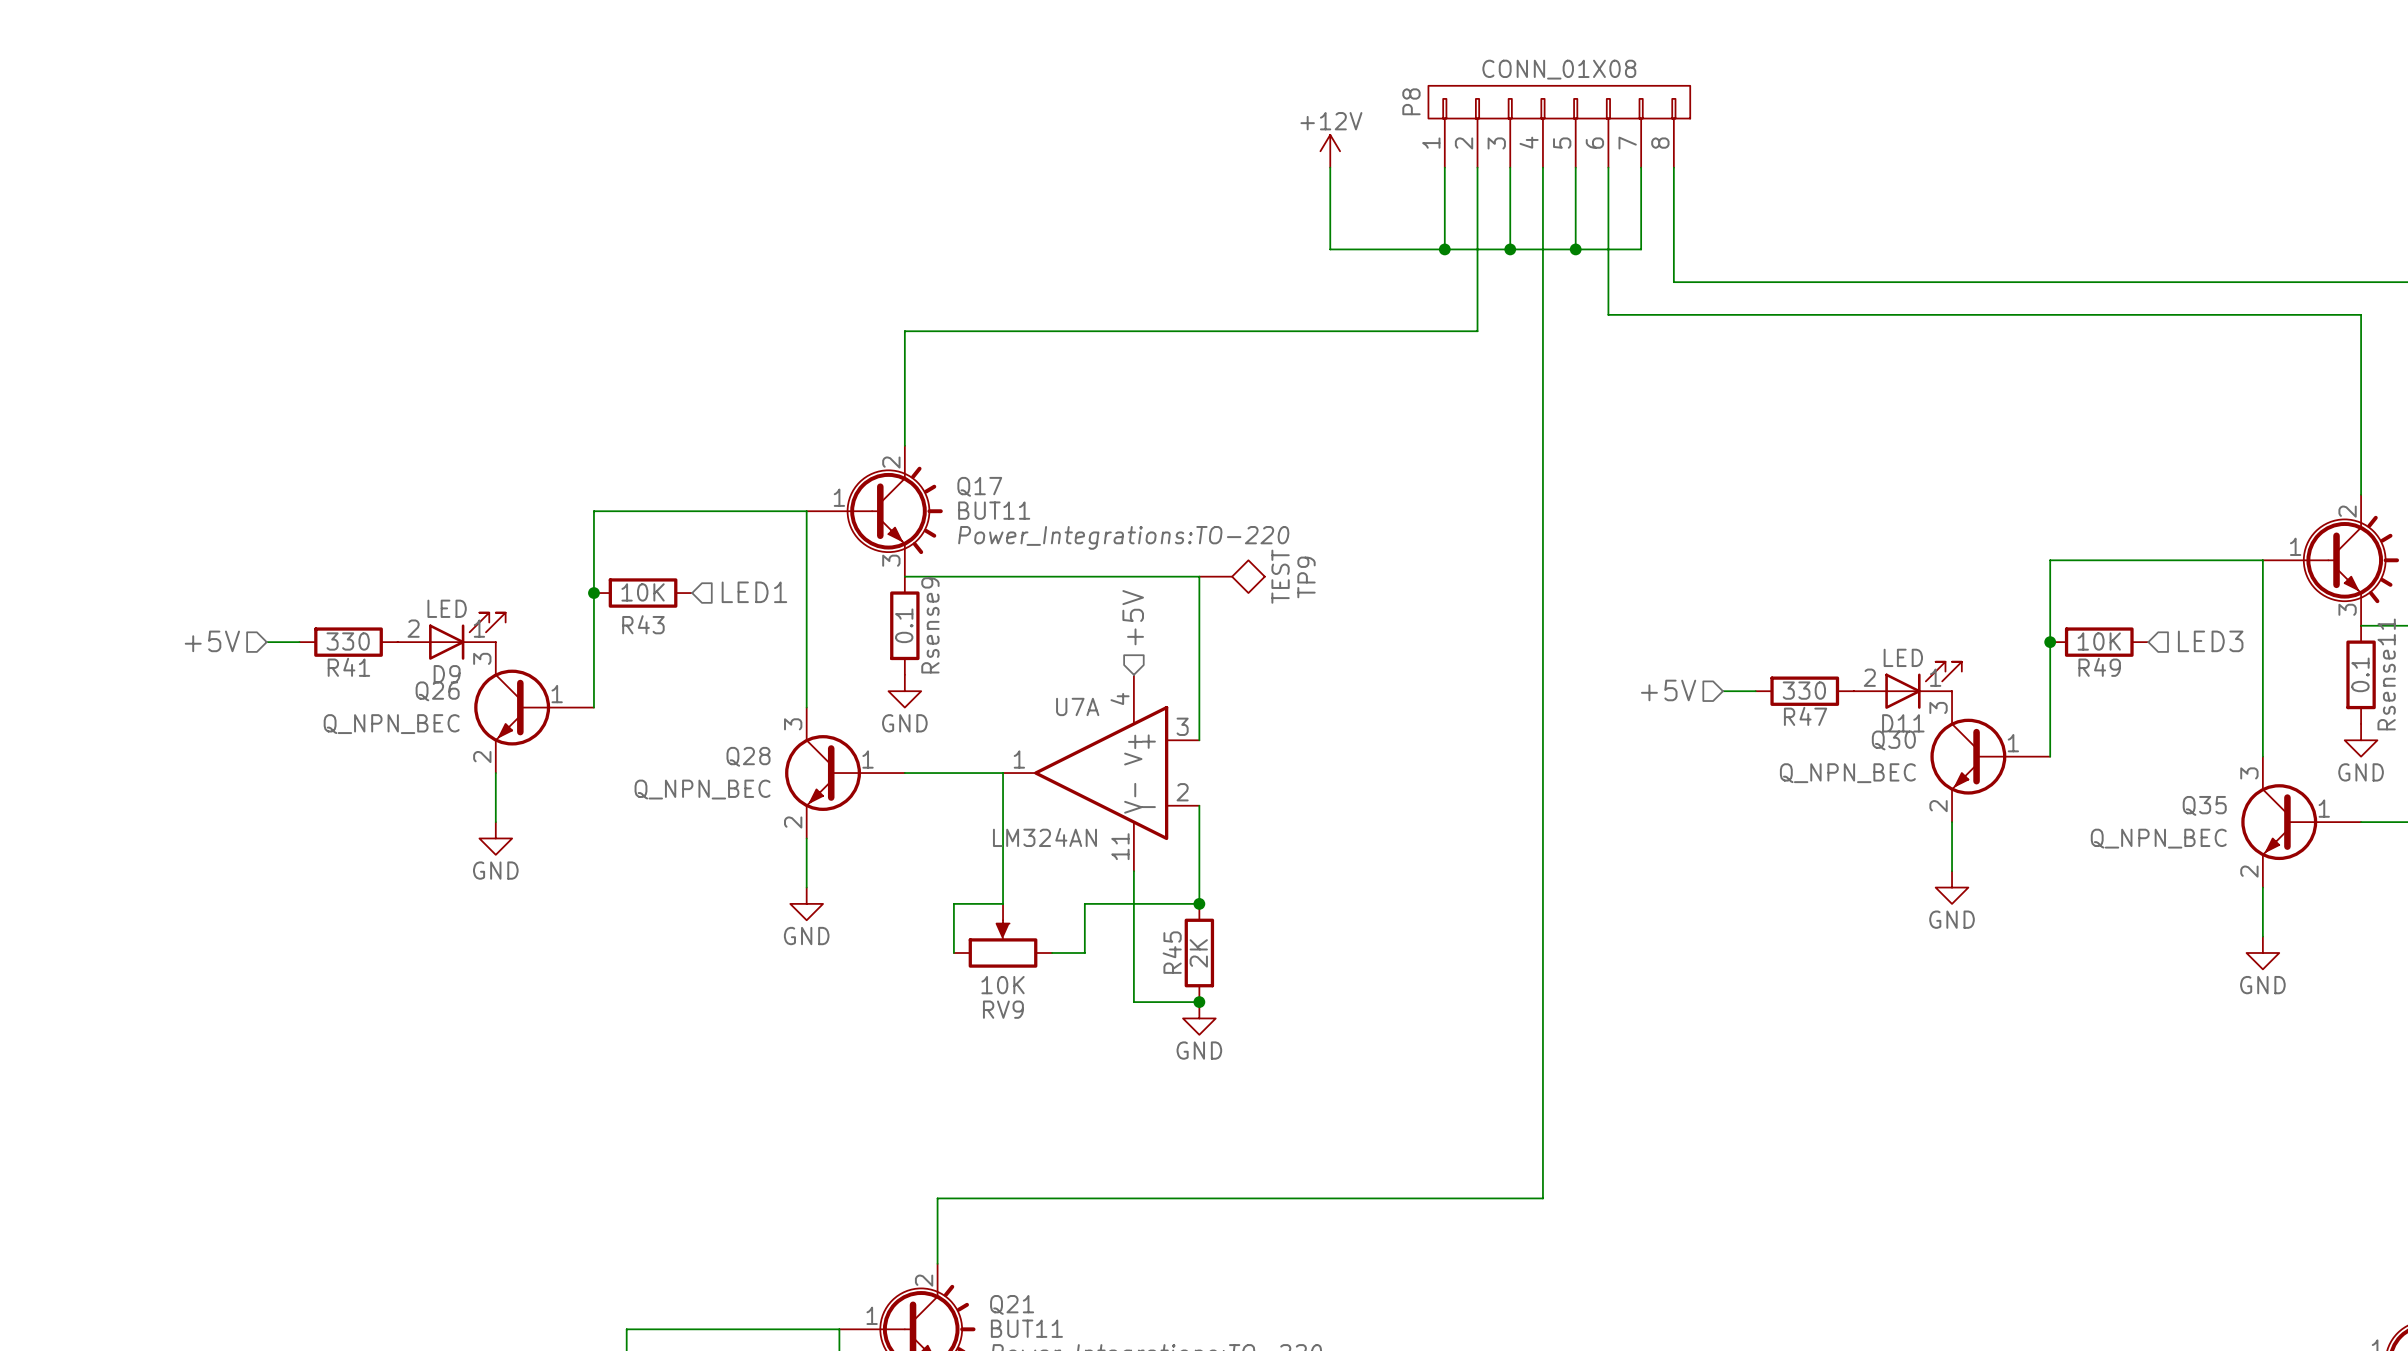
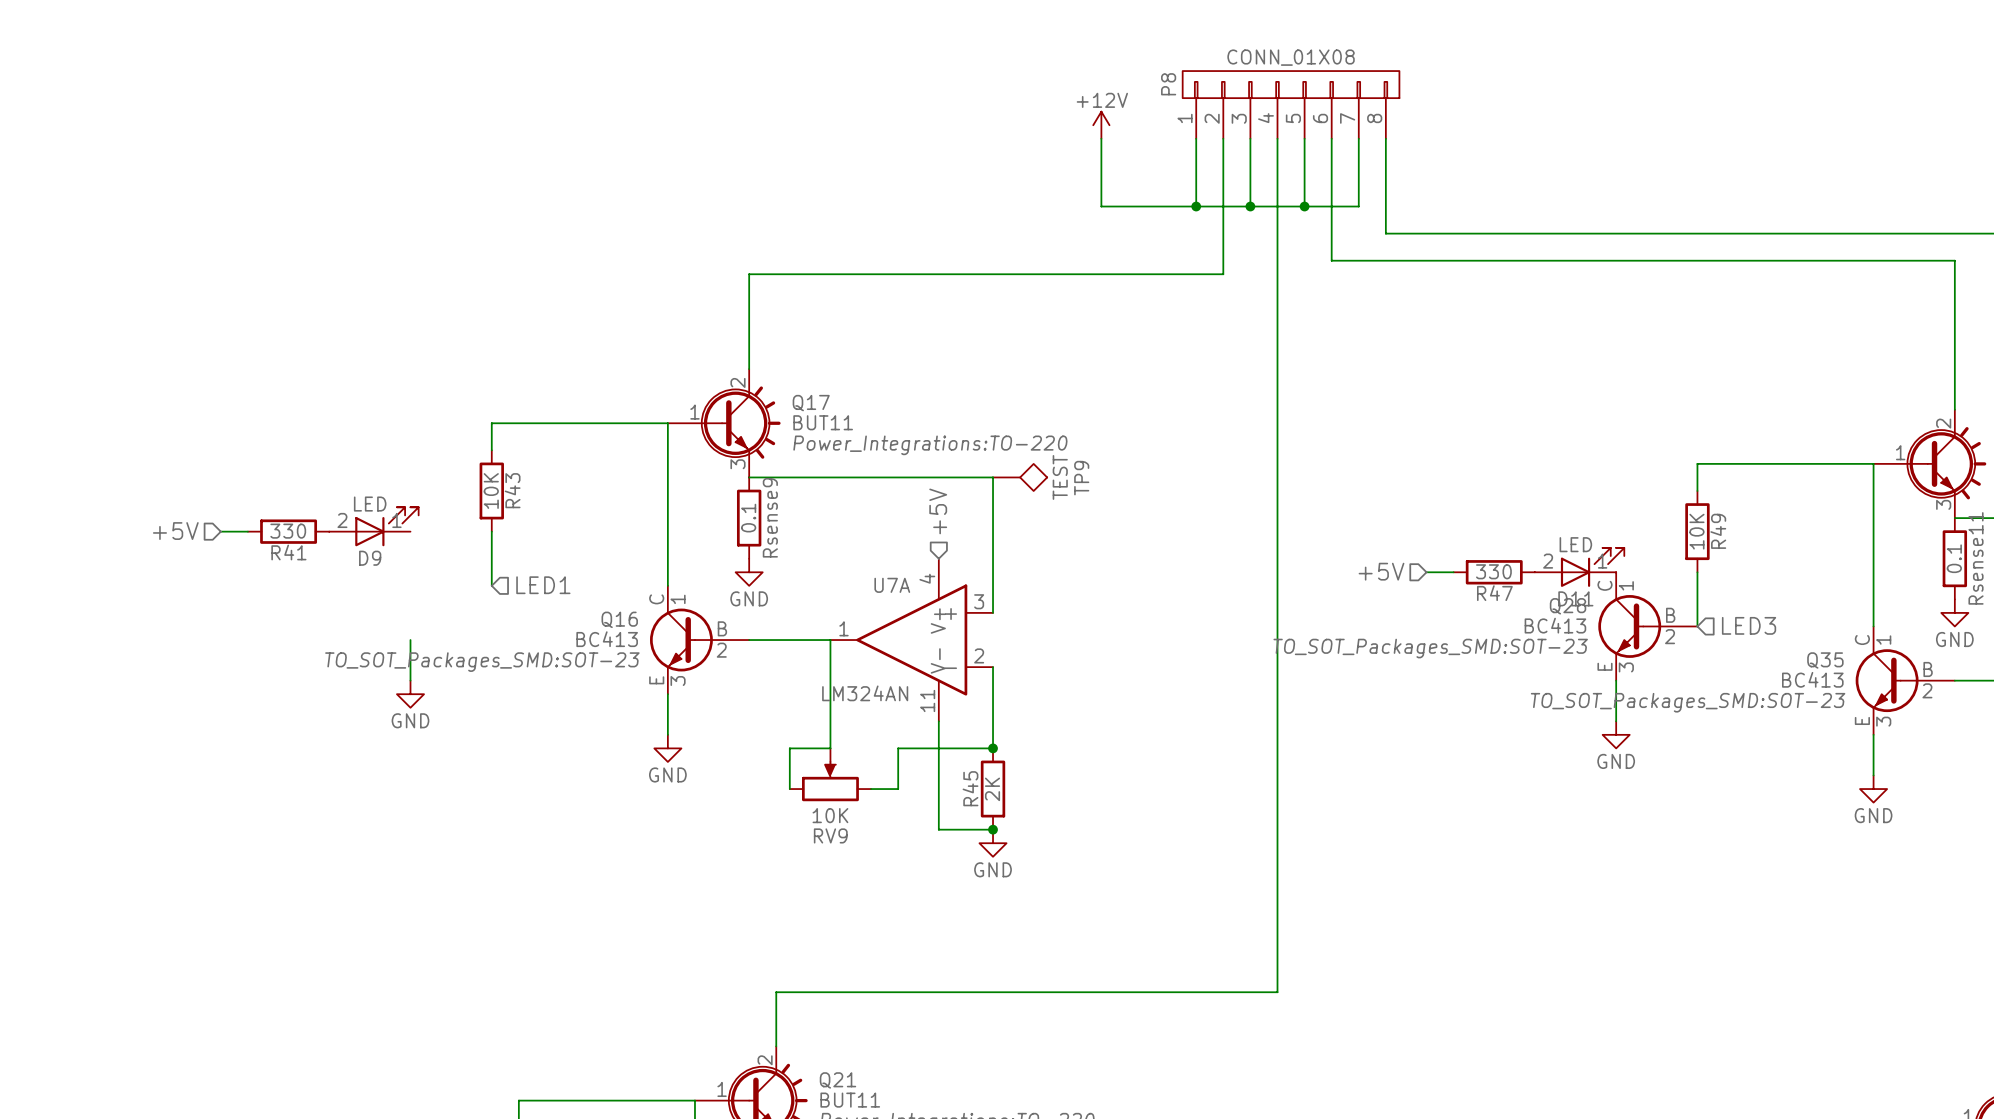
wire: (593, 543) (593, 642) -> none
hierarchical label position: LED1 (754, 592) -> LED1 (543, 585)
junction: (593, 593) -> none
R43 rotation: 0° (643, 593) -> 90° clockwise (491, 491)
wire: (2050, 593) (2050, 691) -> none
R43 name position: R43 (643, 624) -> R43 (512, 490)
hierarchical label position: LED3 (2210, 641) -> LED3 (1749, 625)
junction: (2050, 642) -> none
R49 rotation: 0° (2099, 642) -> 90° clockwise (1697, 531)
R49 name position: R49 (2099, 667) -> R49 (1718, 531)
Q26: Q_NPN_BEC (534, 707) -> none
Q28 symbol: [785, 707, 905, 839] -> [1598, 572, 1698, 681]
Q30: Q_NPN_BEC (1990, 756) -> none
Q35 symbol: [2241, 756, 2362, 888] -> [1855, 626, 1955, 735]
Q16: none -> BC413 (699, 640)
Q28 text: none -> TO_SOT_Packages_SMD:SOT-23 (1430, 648)
Q28 value: Q_NPN_BEC (702, 789) -> BC413 (1555, 625)
Q35 value: Q_NPN_BEC (2158, 838) -> BC413 (1812, 679)
Q35 text: none -> TO_SOT_Packages_SMD:SOT-23 (1688, 702)

